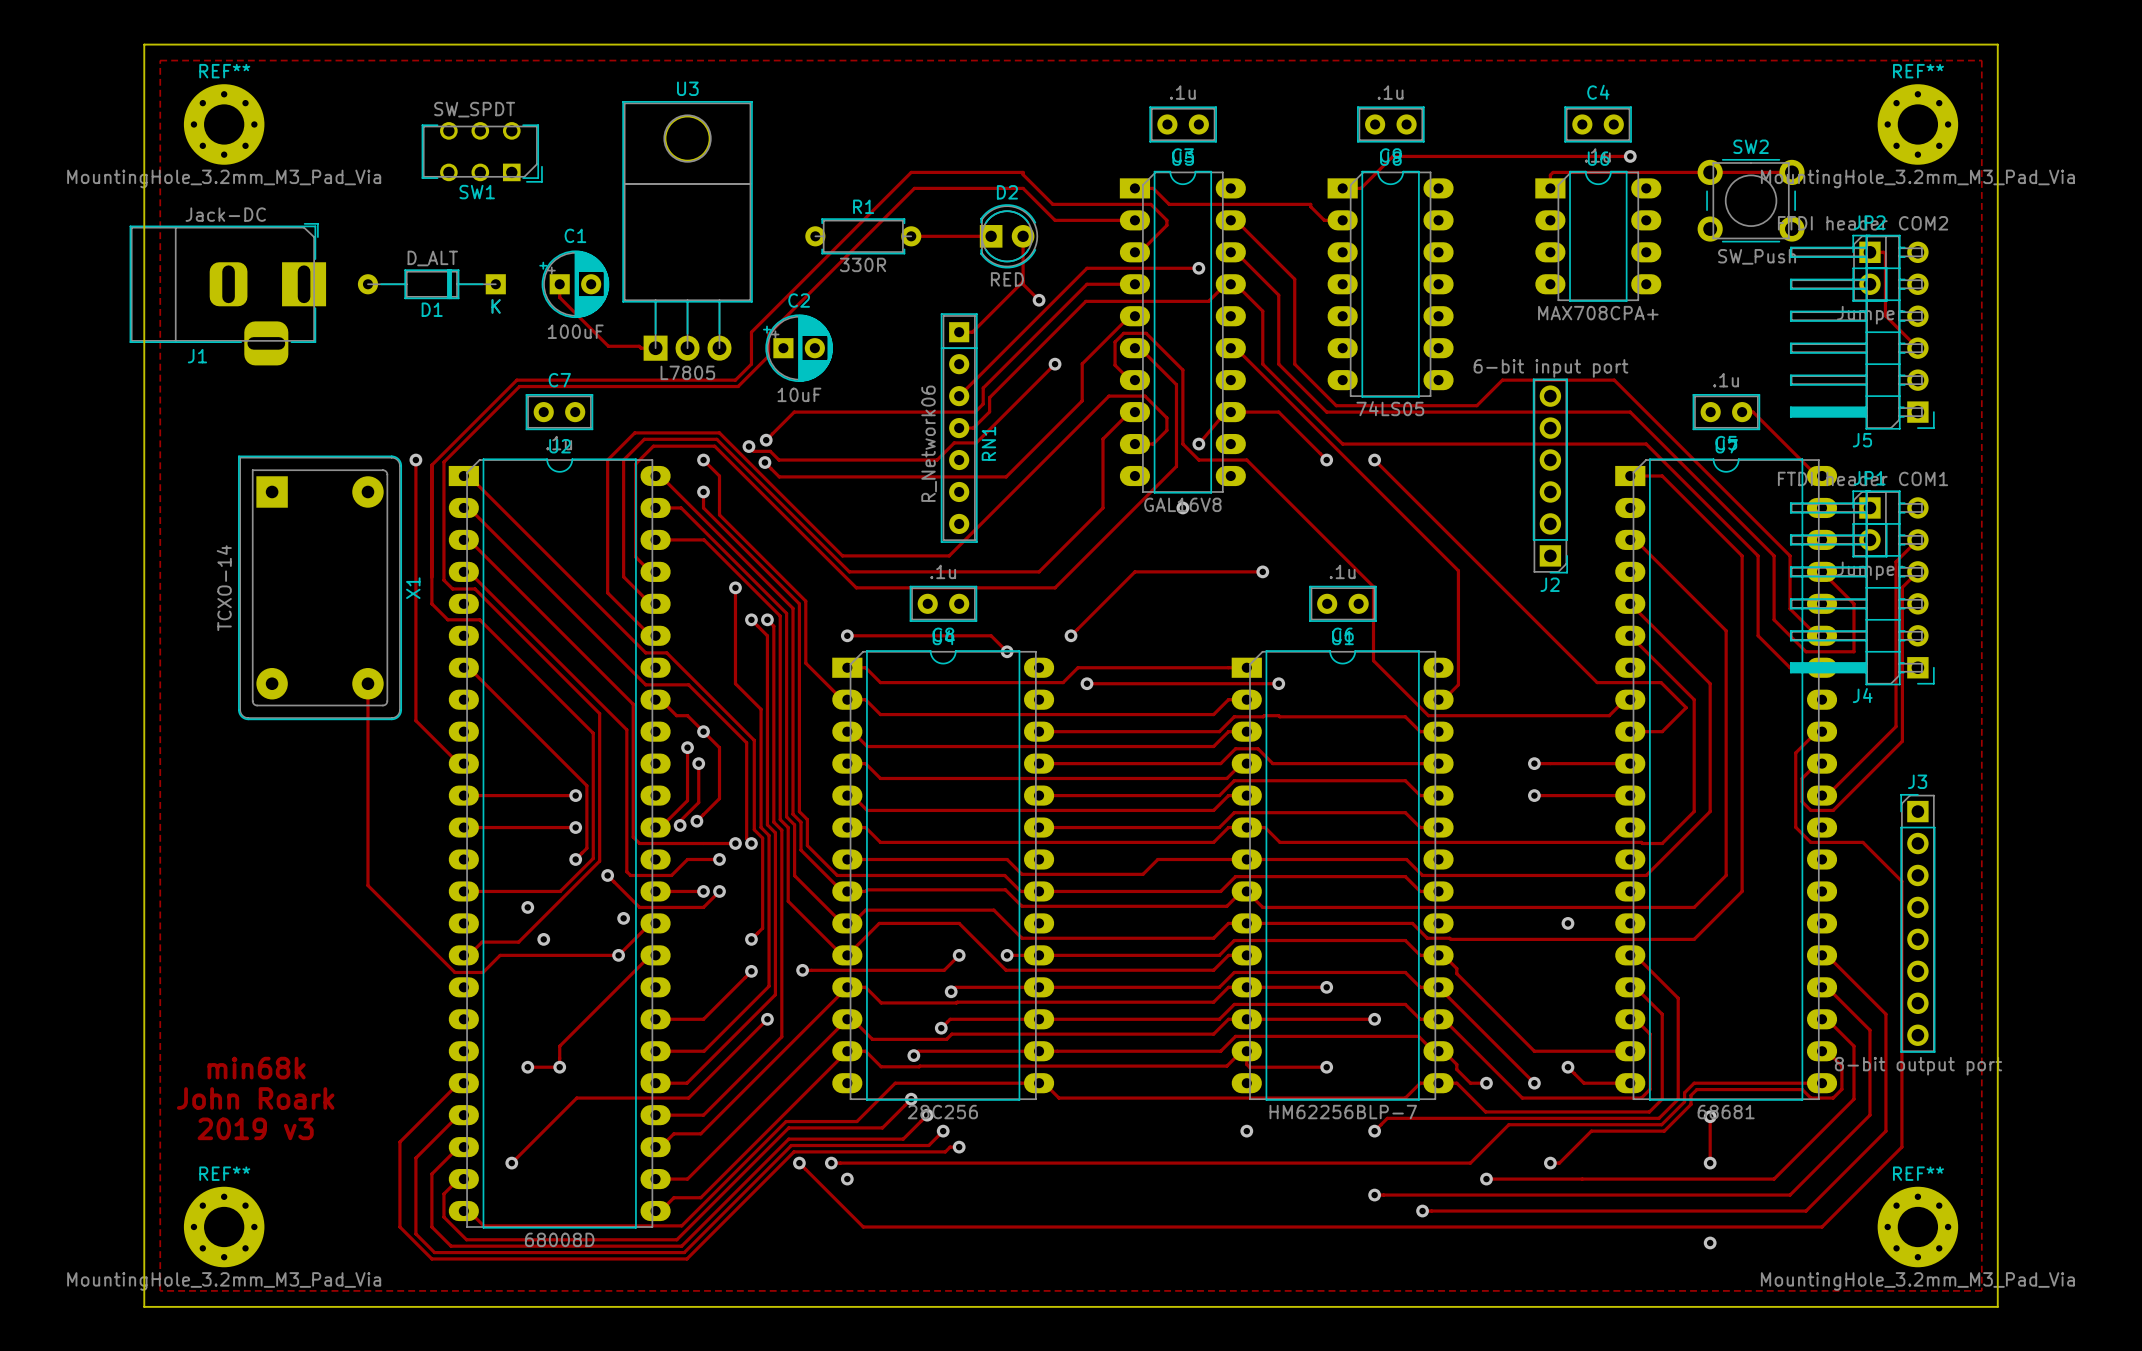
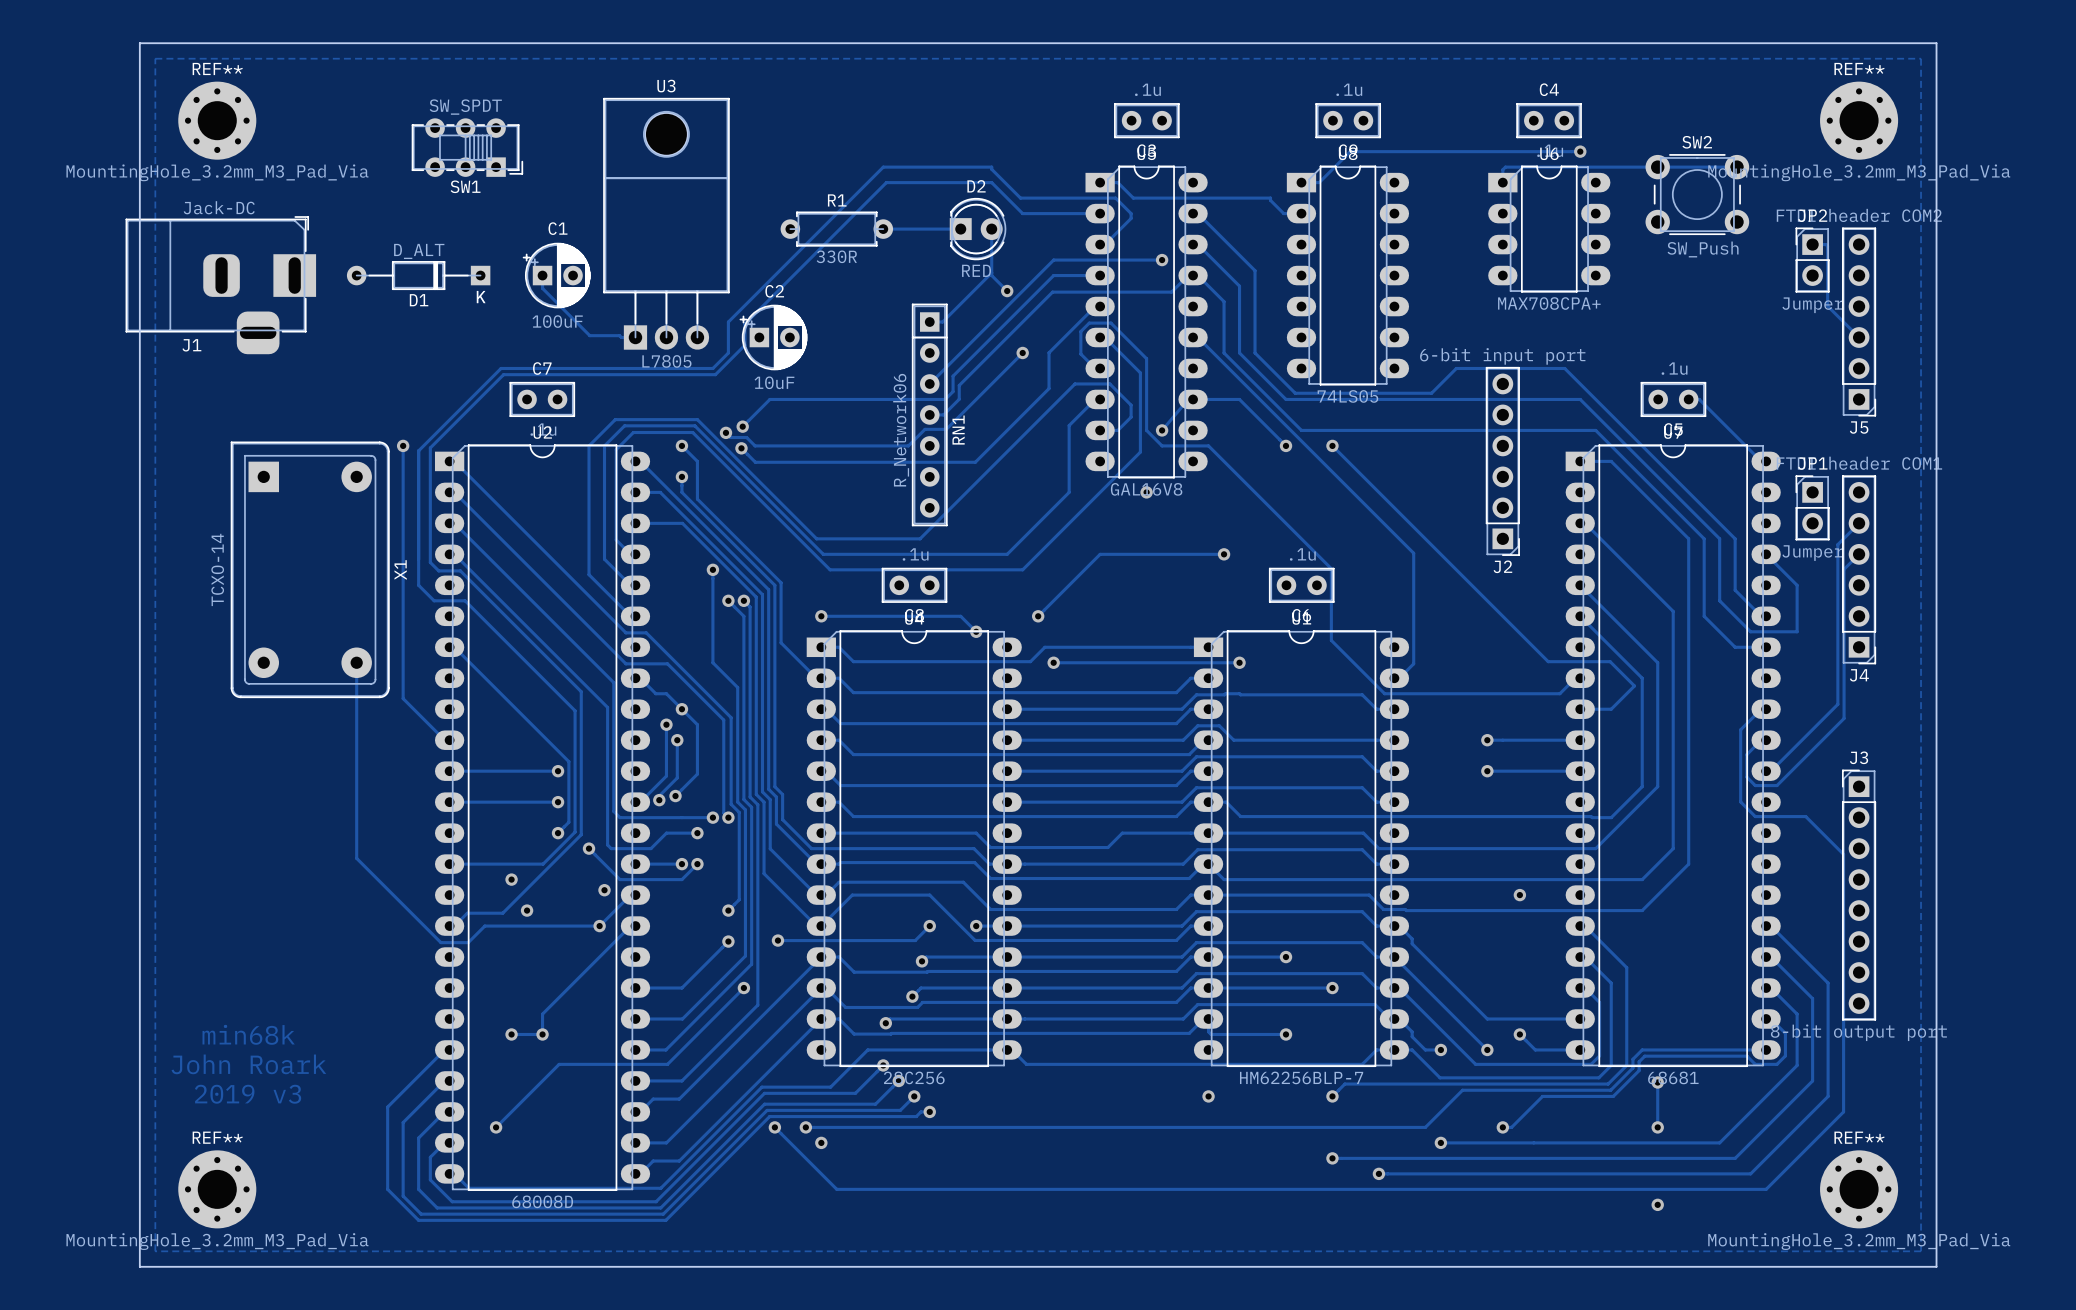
SW1 footprint: [421, 122, 543, 183] -> [411, 118, 524, 177]
J5 footprint: [1790, 234, 1935, 430] -> [1842, 227, 1877, 417]
J4 footprint: [1790, 490, 1935, 686] -> [1842, 475, 1877, 665]

